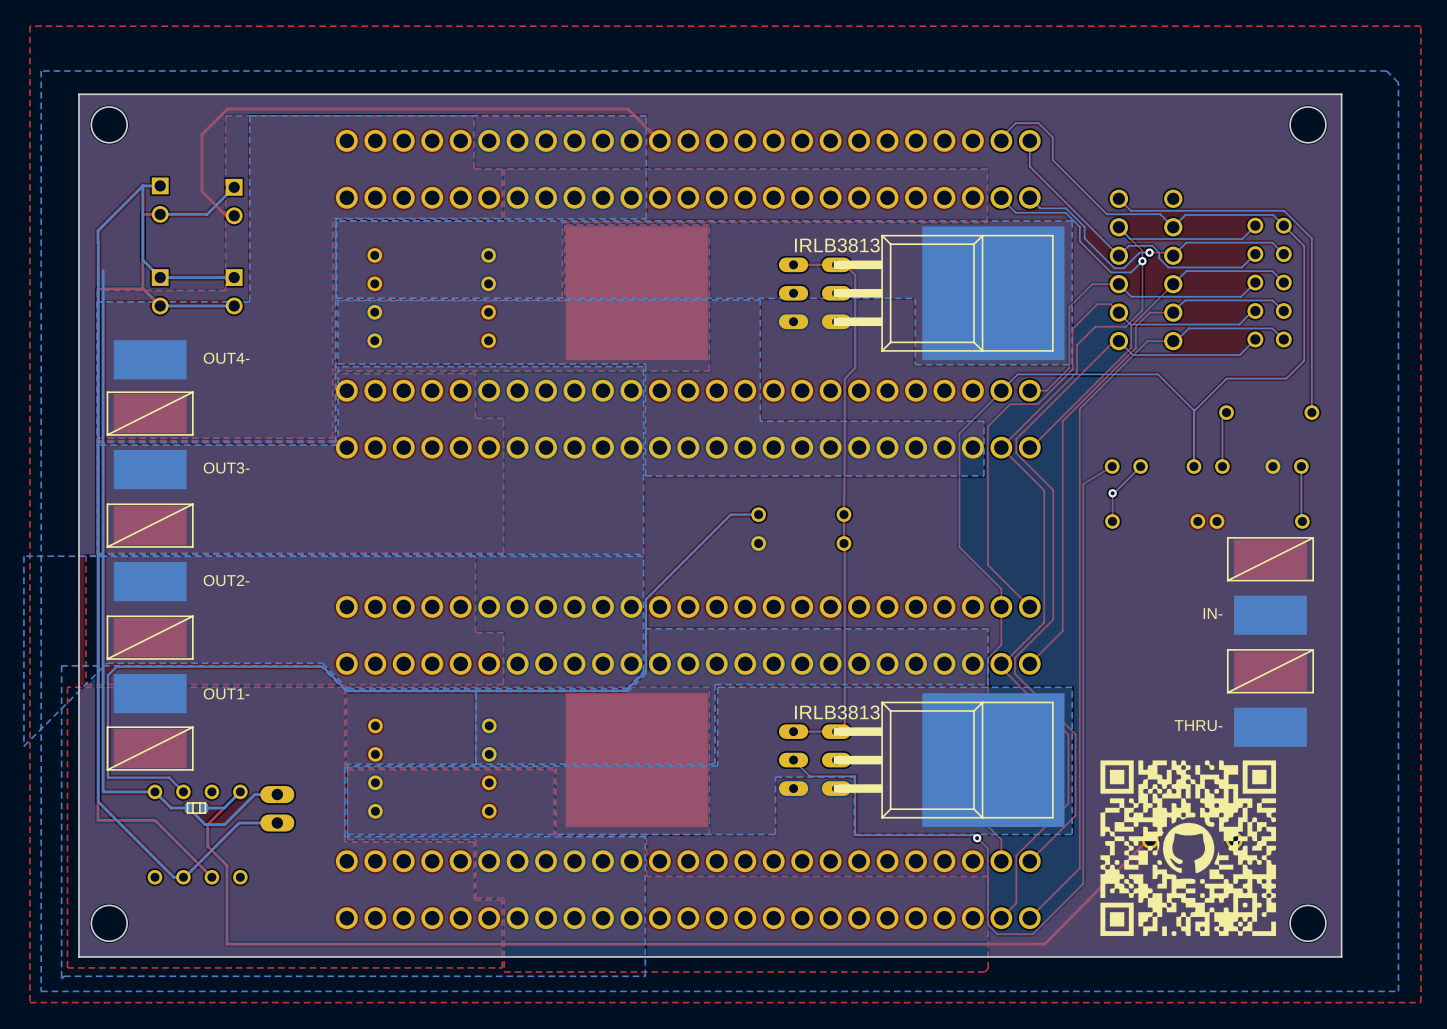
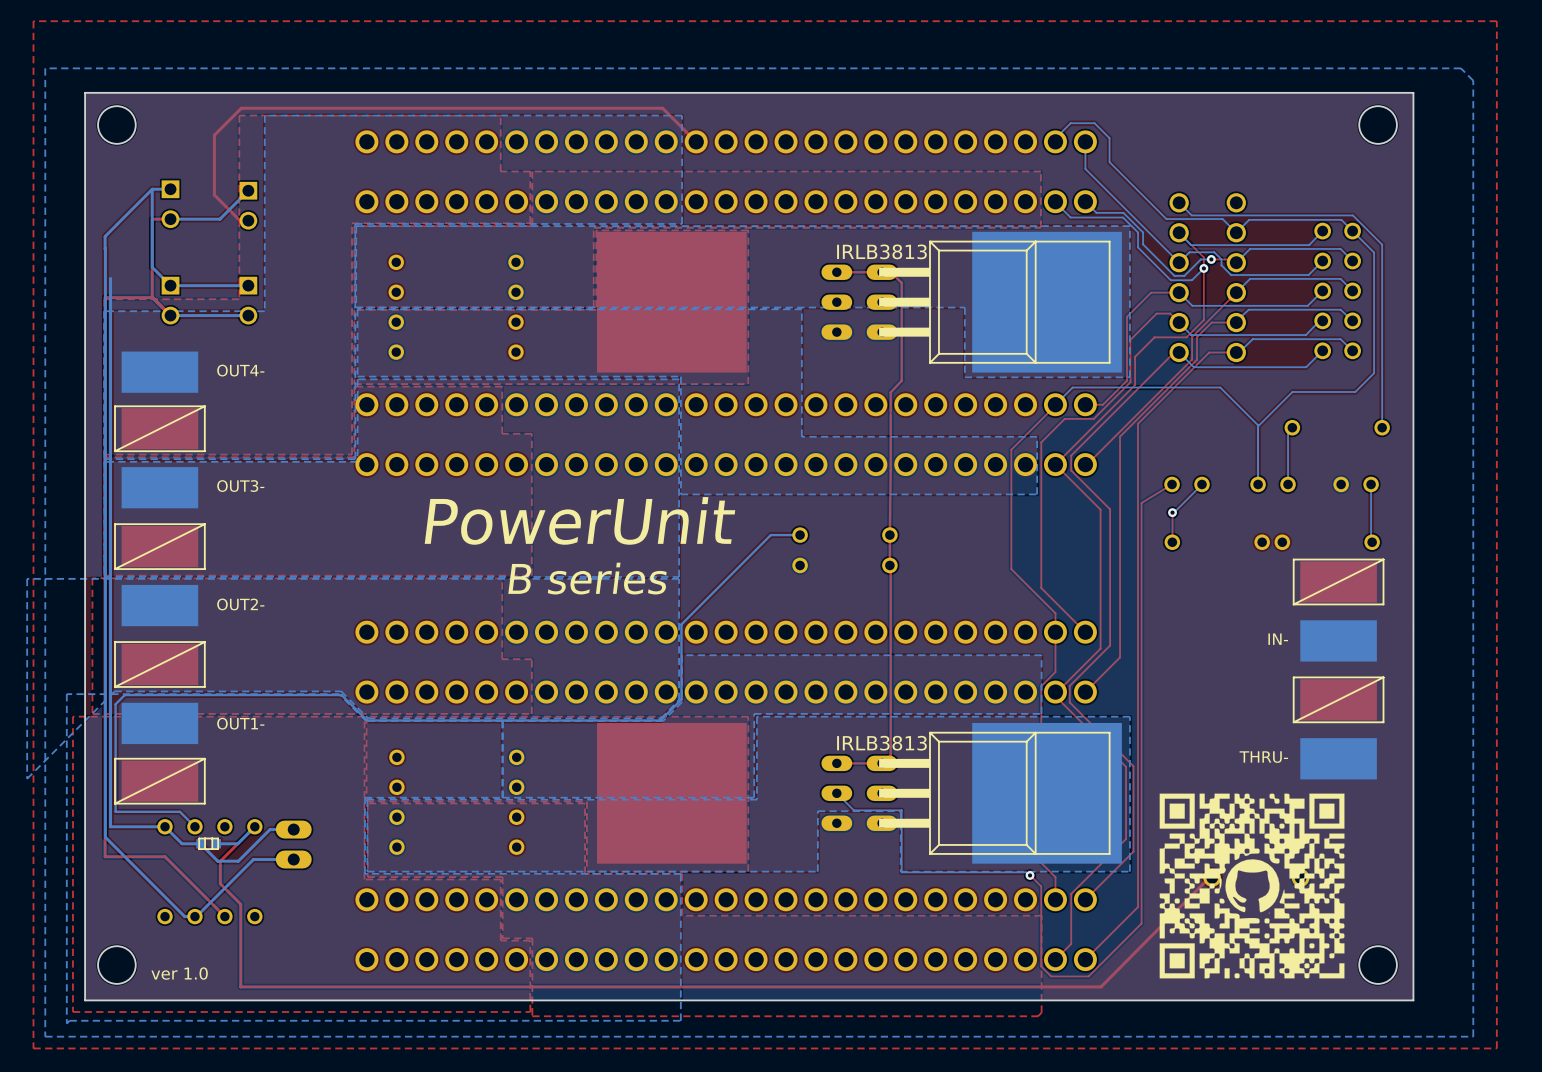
text: none -> PowerUnit (579, 520)
text: none -> B series (587, 578)
text: none -> ver 1.0 (179, 973)

